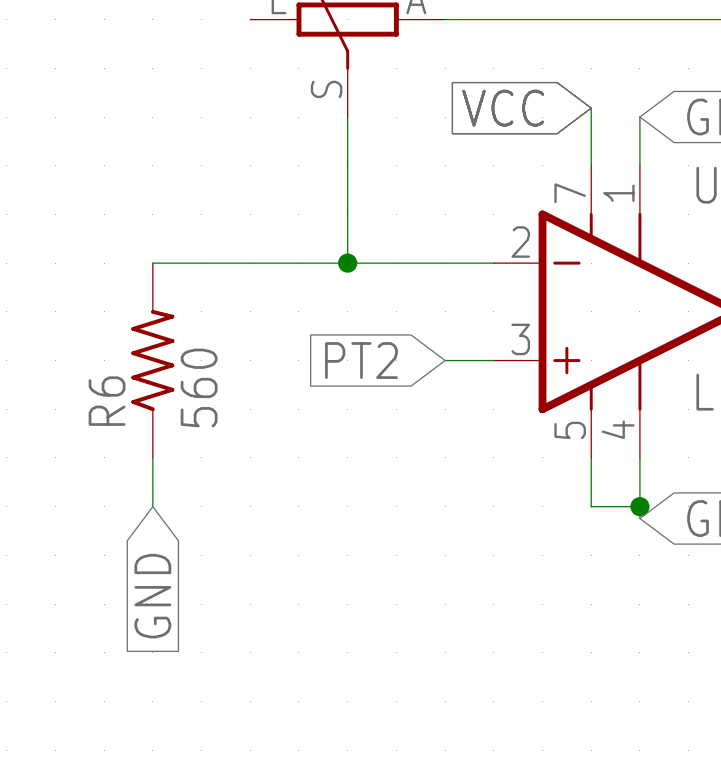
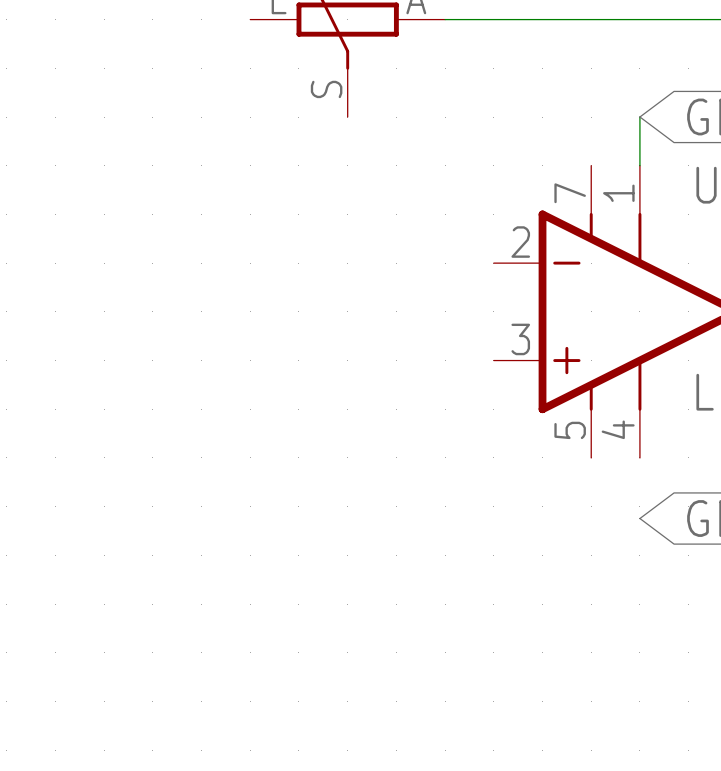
global label: VCC (503, 108) -> none
wire: (591, 108) (591, 165) -> none
wire: (347, 117) (347, 263) -> none
wire: (152, 263) (493, 263) -> none
junction: (347, 263) -> none
R6: 560 (152, 360) -> none
global label: PT2 (361, 360) -> none
wire: (445, 360) (493, 360) -> none
wire: (152, 457) (152, 506) -> none
wire: (591, 457) (591, 506) (639, 506) -> none
wire: (639, 457) (639, 518) -> none
junction: (639, 506) -> none
global label: GND (152, 596) -> none

